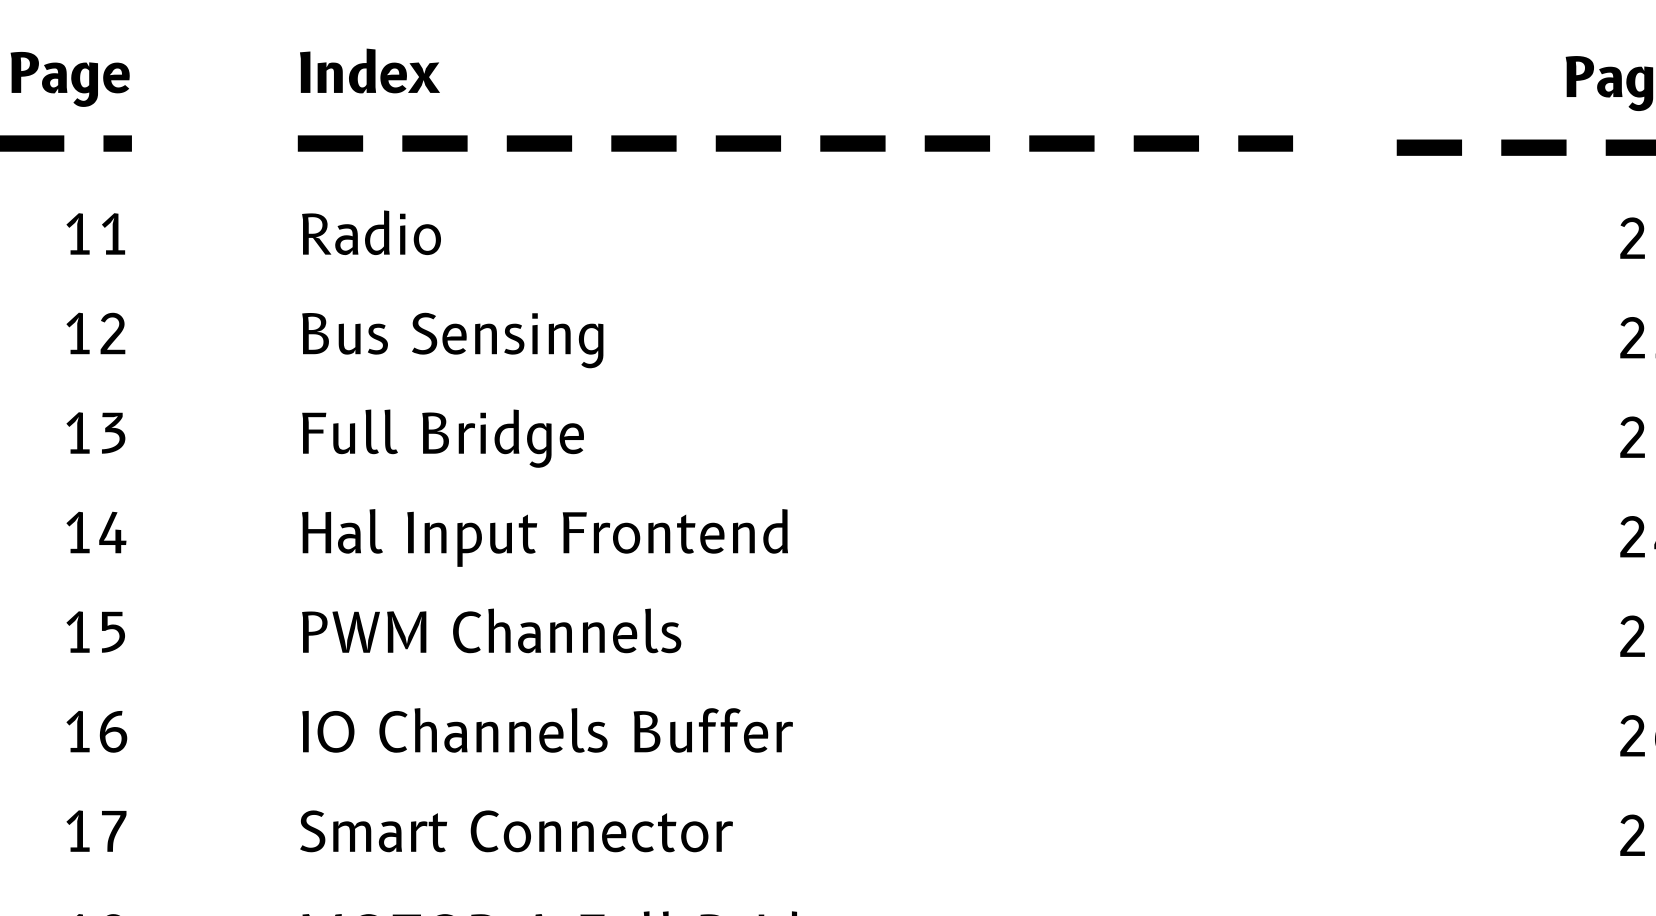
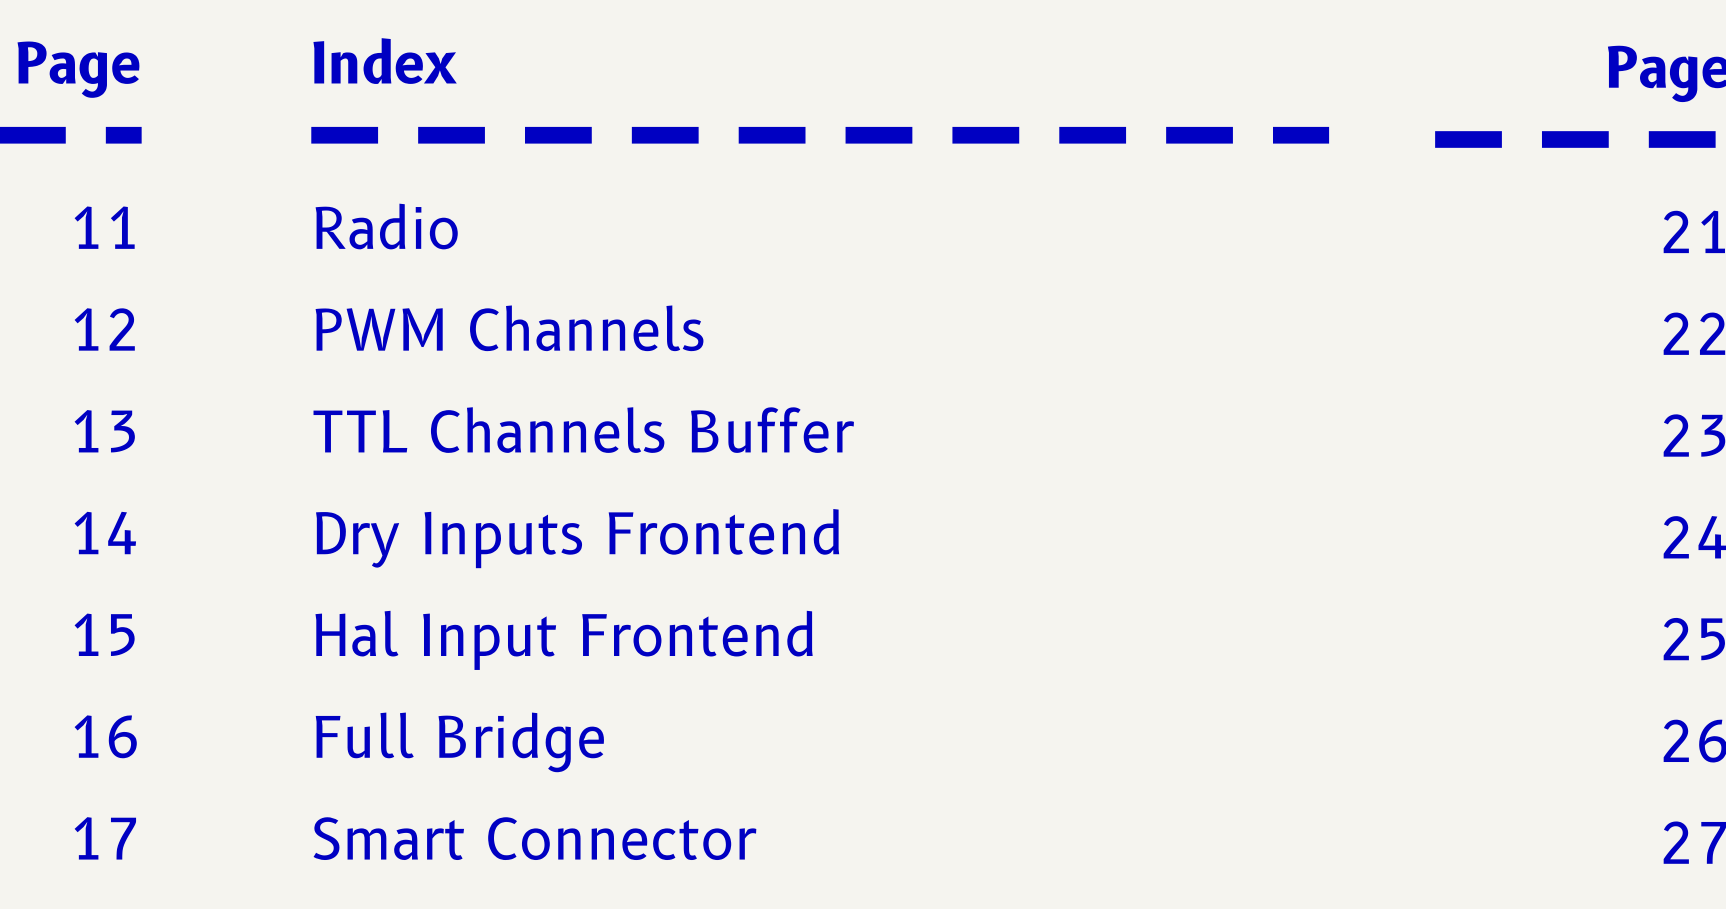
text: Bus Sensing (452, 340) -> PWM Channels (509, 328)
text: Full Bridge (443, 438) -> TTL Channels Buffer (583, 430)
text: Hal Input Frontend (545, 537) -> Dry Inputs Frontend (577, 538)
text: PWM Channels (491, 630) -> Hal Input Frontend (564, 640)
text: IO Channels Buffer (547, 730) -> Full Bridge (459, 742)

